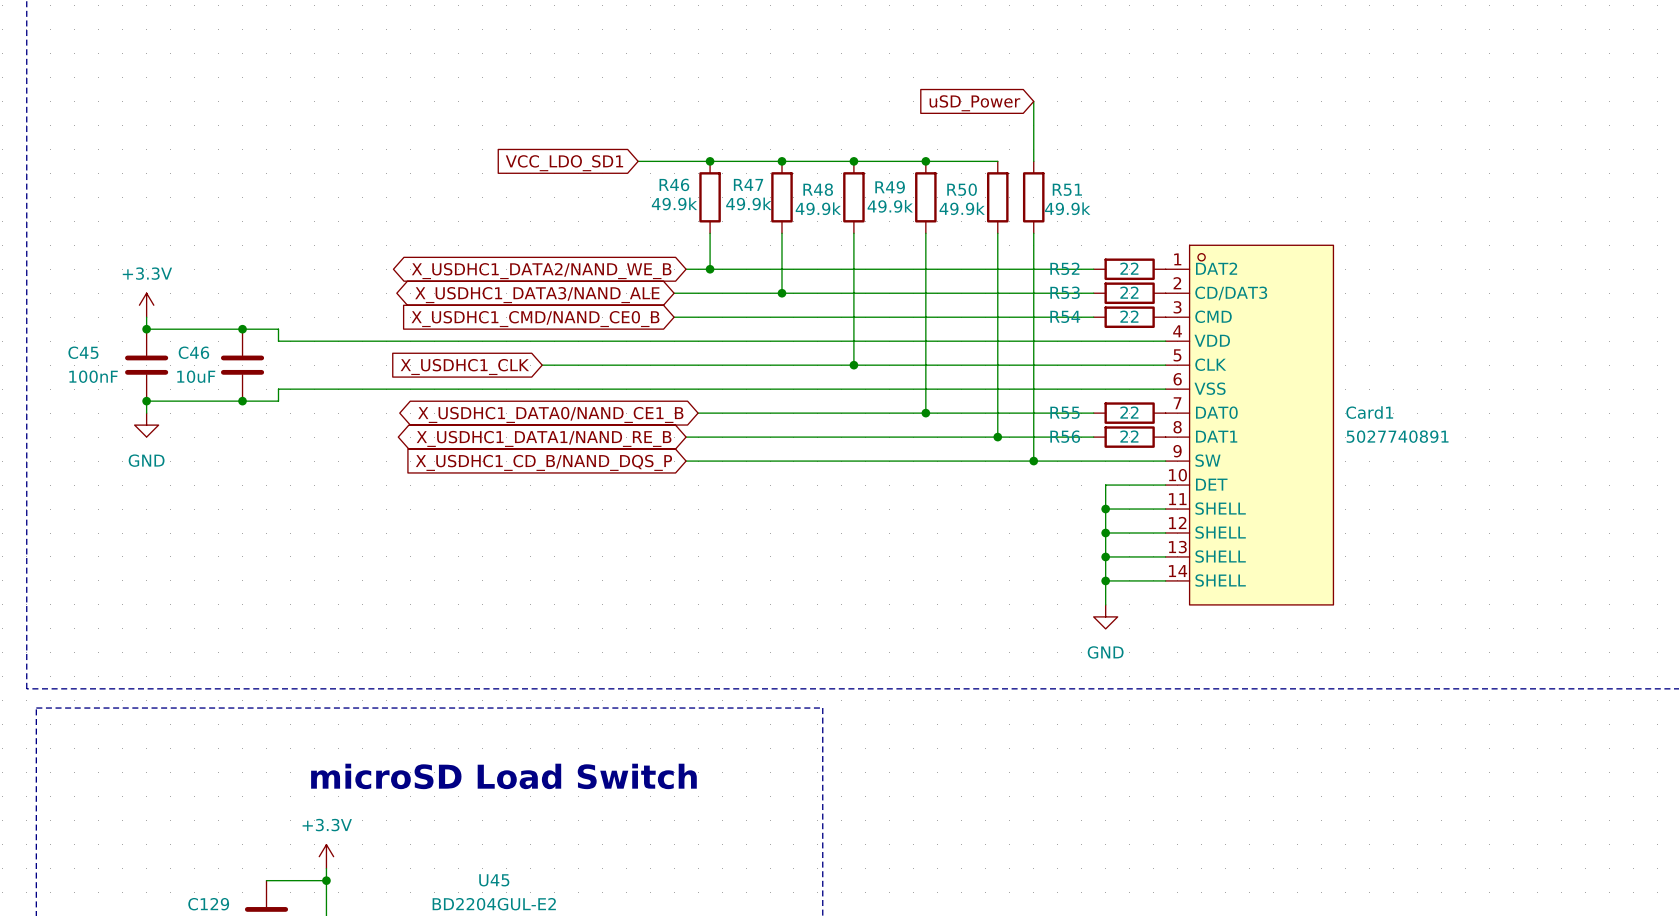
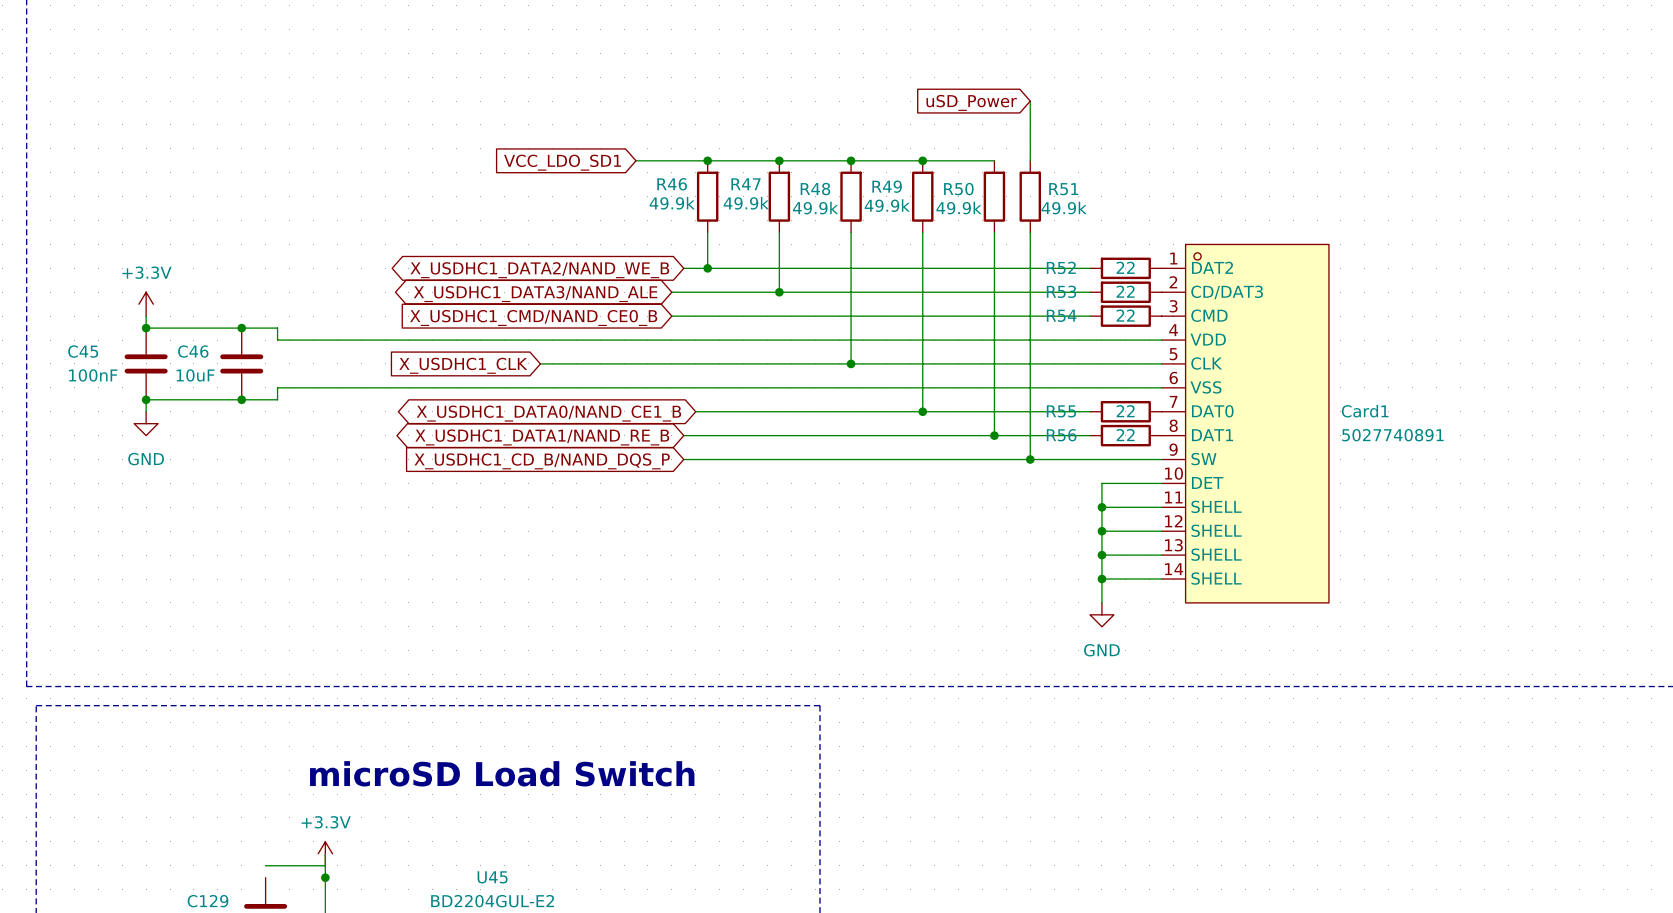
wire: none -> (325, 853) (325, 865) (265, 865)
wire: (266, 880) (326, 880) -> none

